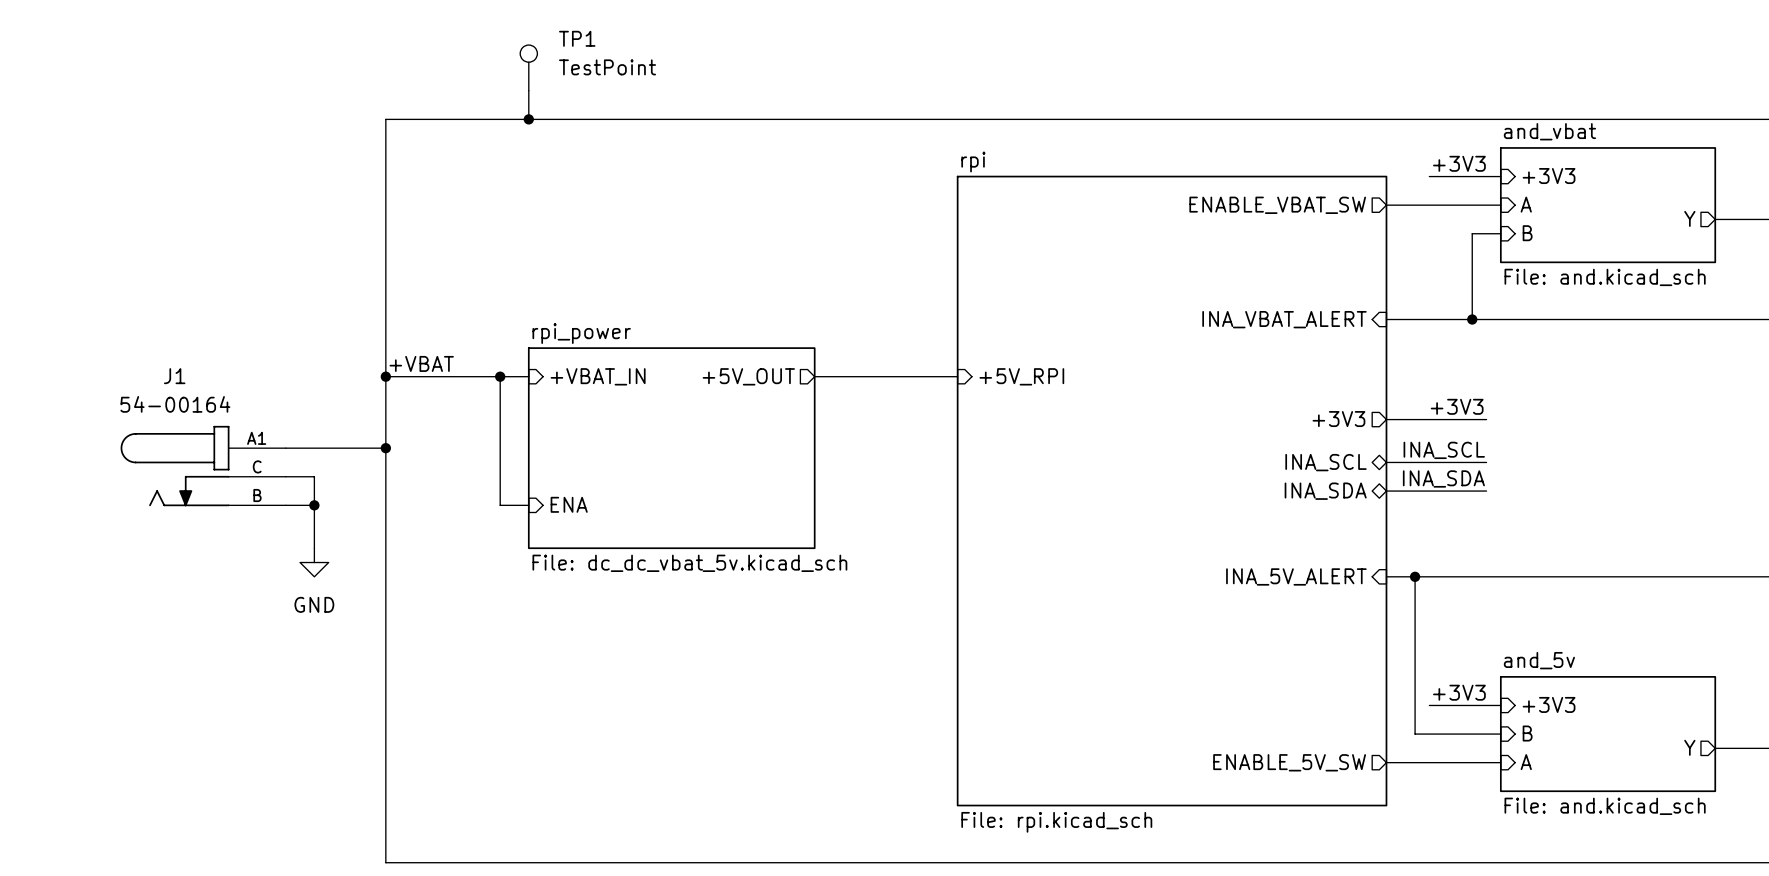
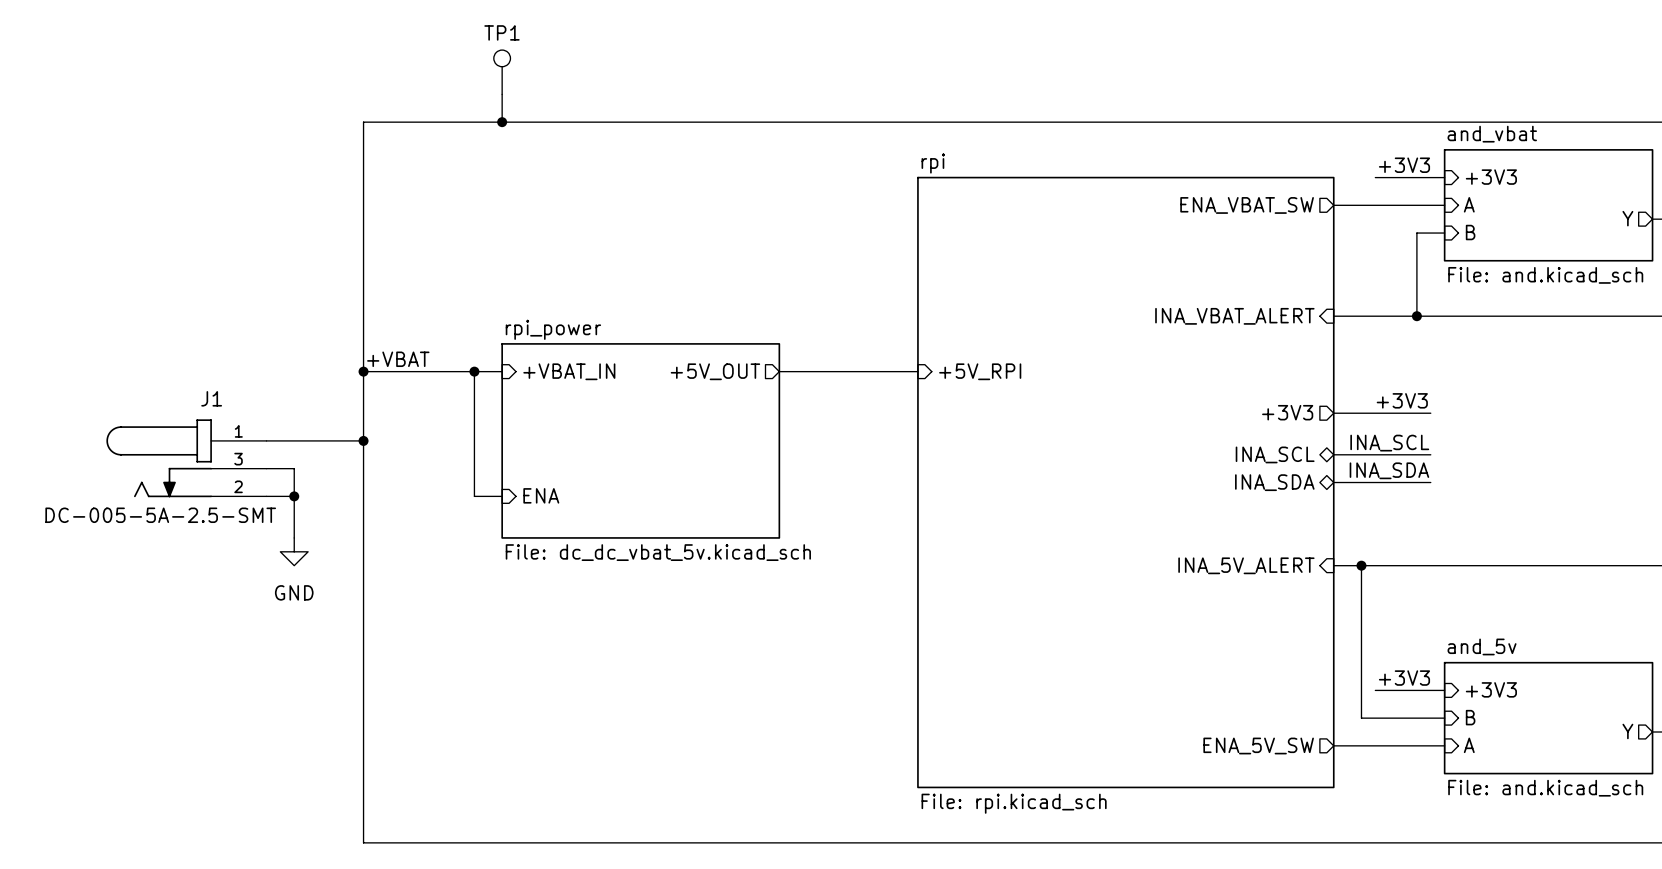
TP1 name position: TP1 (577, 38) -> TP1 (501, 32)
TP1 value: TestPoint (607, 67) -> none
sheet pin: ENABLE_VBAT_SW (1277, 205) -> ENA_VBAT_SW (1247, 205)
J1 name position: J1 (174, 376) -> J1 (211, 398)
J1 value: 54-00164 (175, 404) -> DC-005-5A-2.5-SMT (160, 515)
J1 pin number: A1 (256, 438) -> 1 (238, 431)
J1 pin number: C (257, 466) -> 3 (238, 459)
J1 pin number: B (257, 495) -> 2 (238, 486)
sheet pin: ENABLE_5V_SW (1289, 762) -> ENA_5V_SW (1258, 746)

